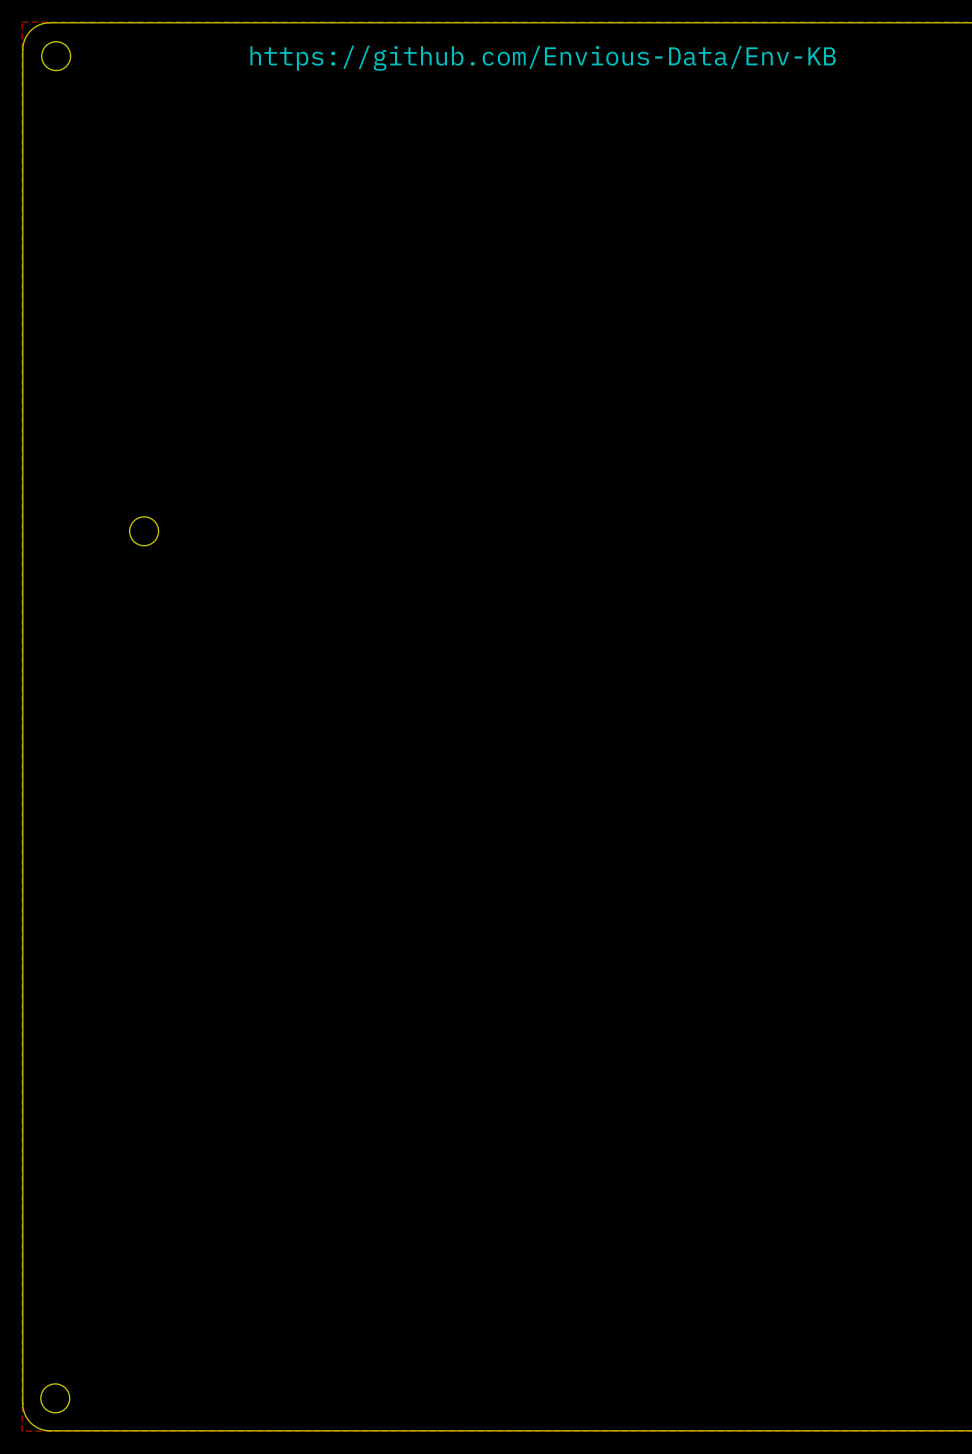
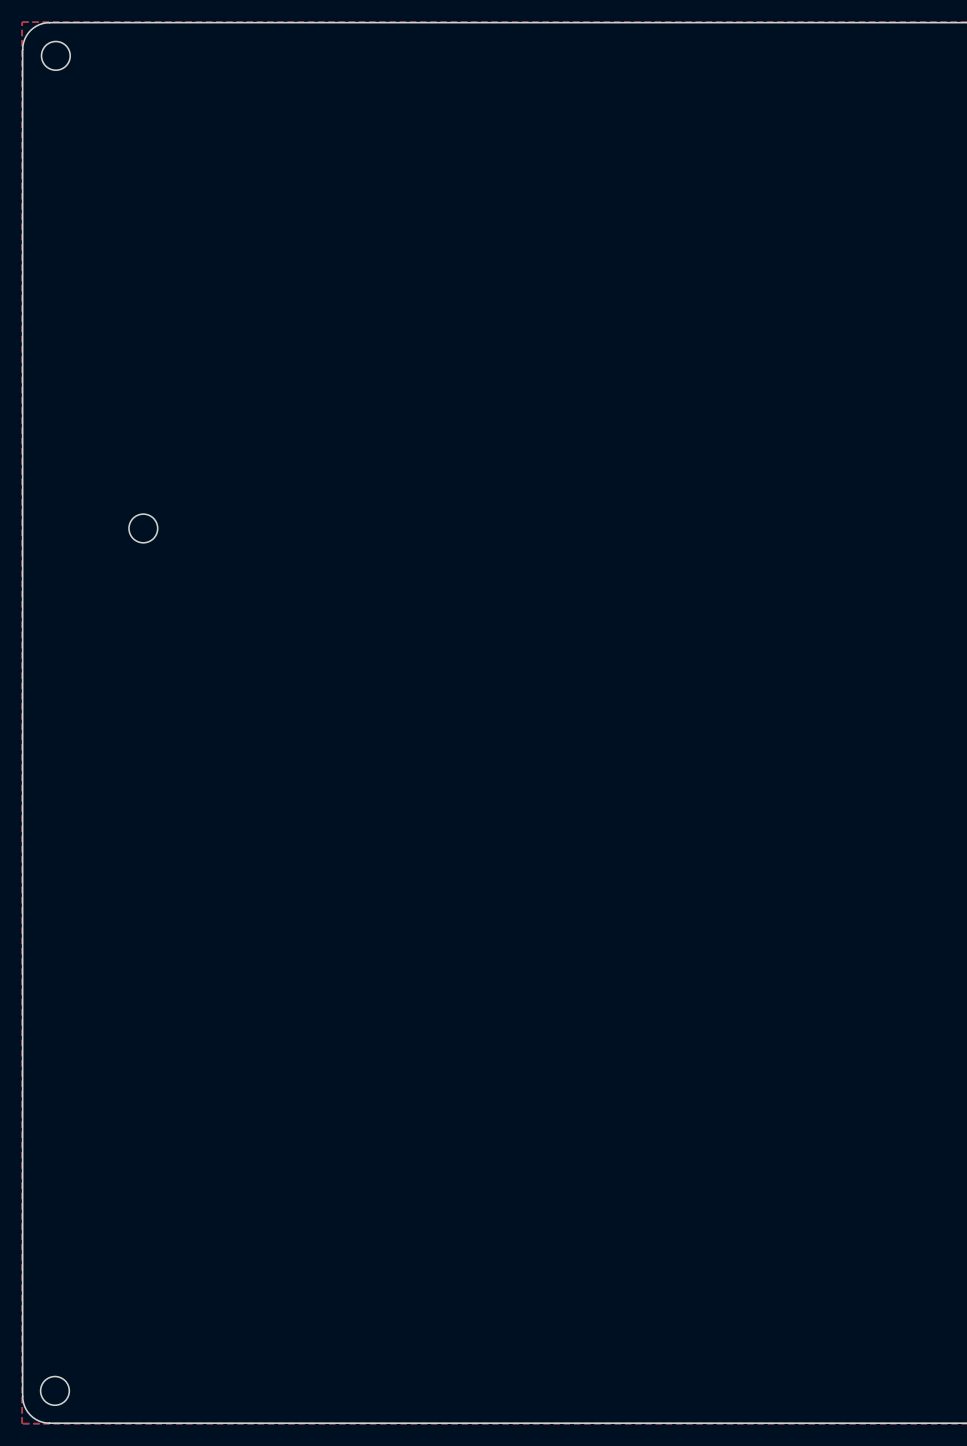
text: https://github.com/Envious-Data/Env-KB (543, 58) -> none

